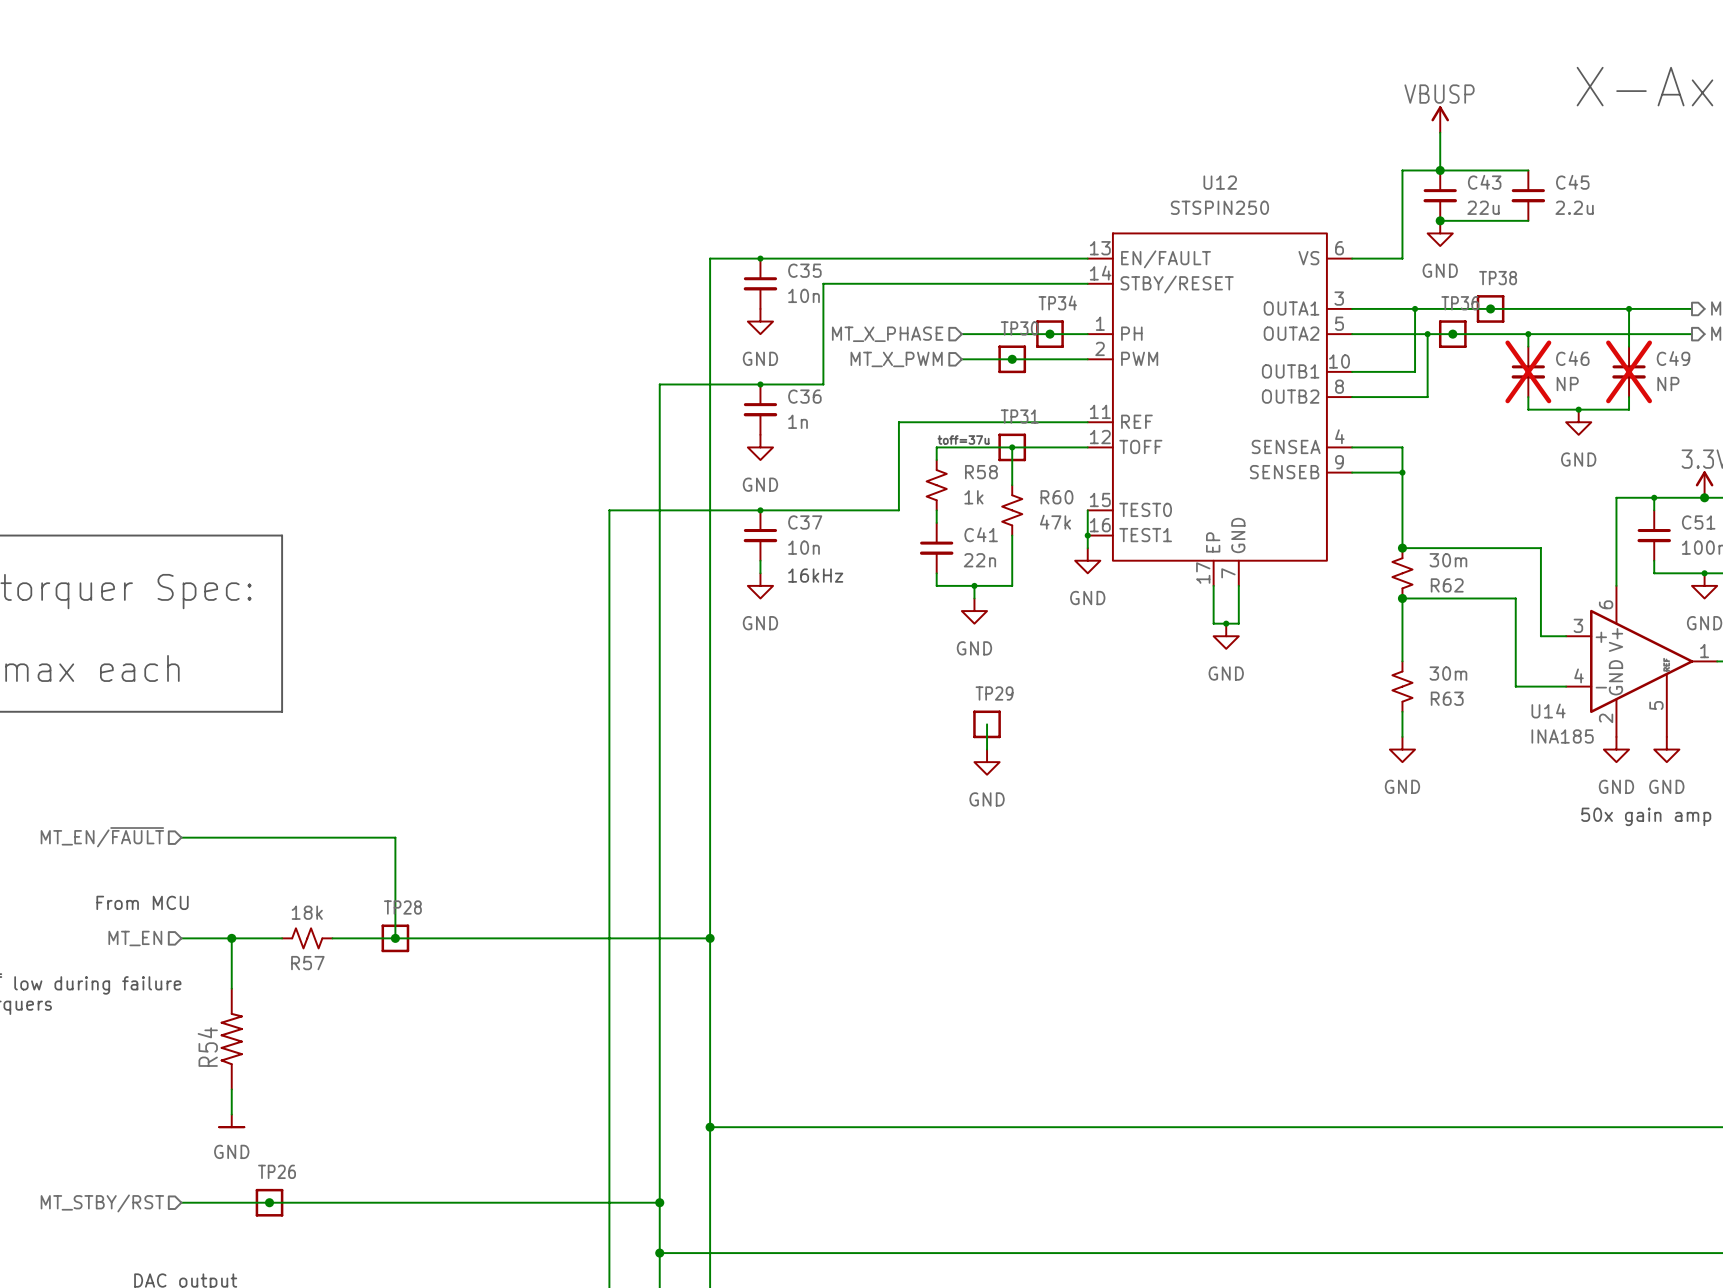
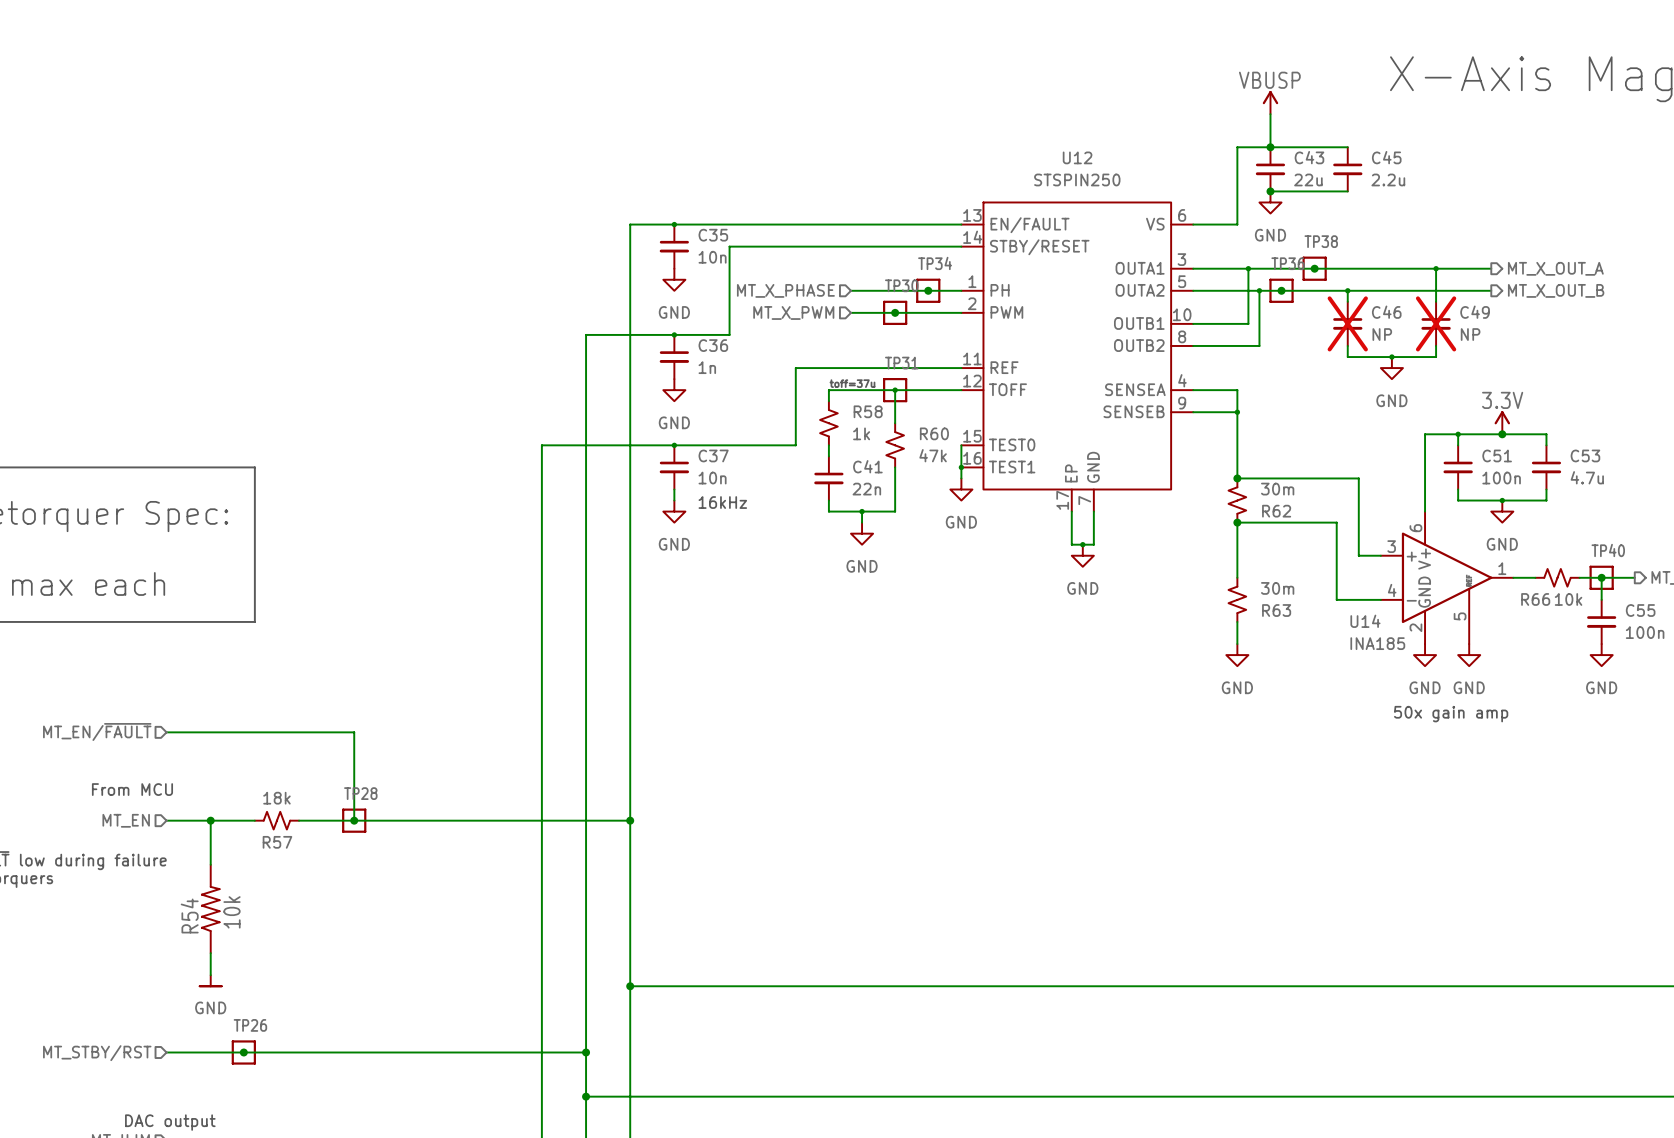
wire: (987, 724) (987, 749) -> none
TP29: (987, 724) -> none
power symbol: GND (987, 762) -> none
R54 value: none -> 10k (232, 912)

